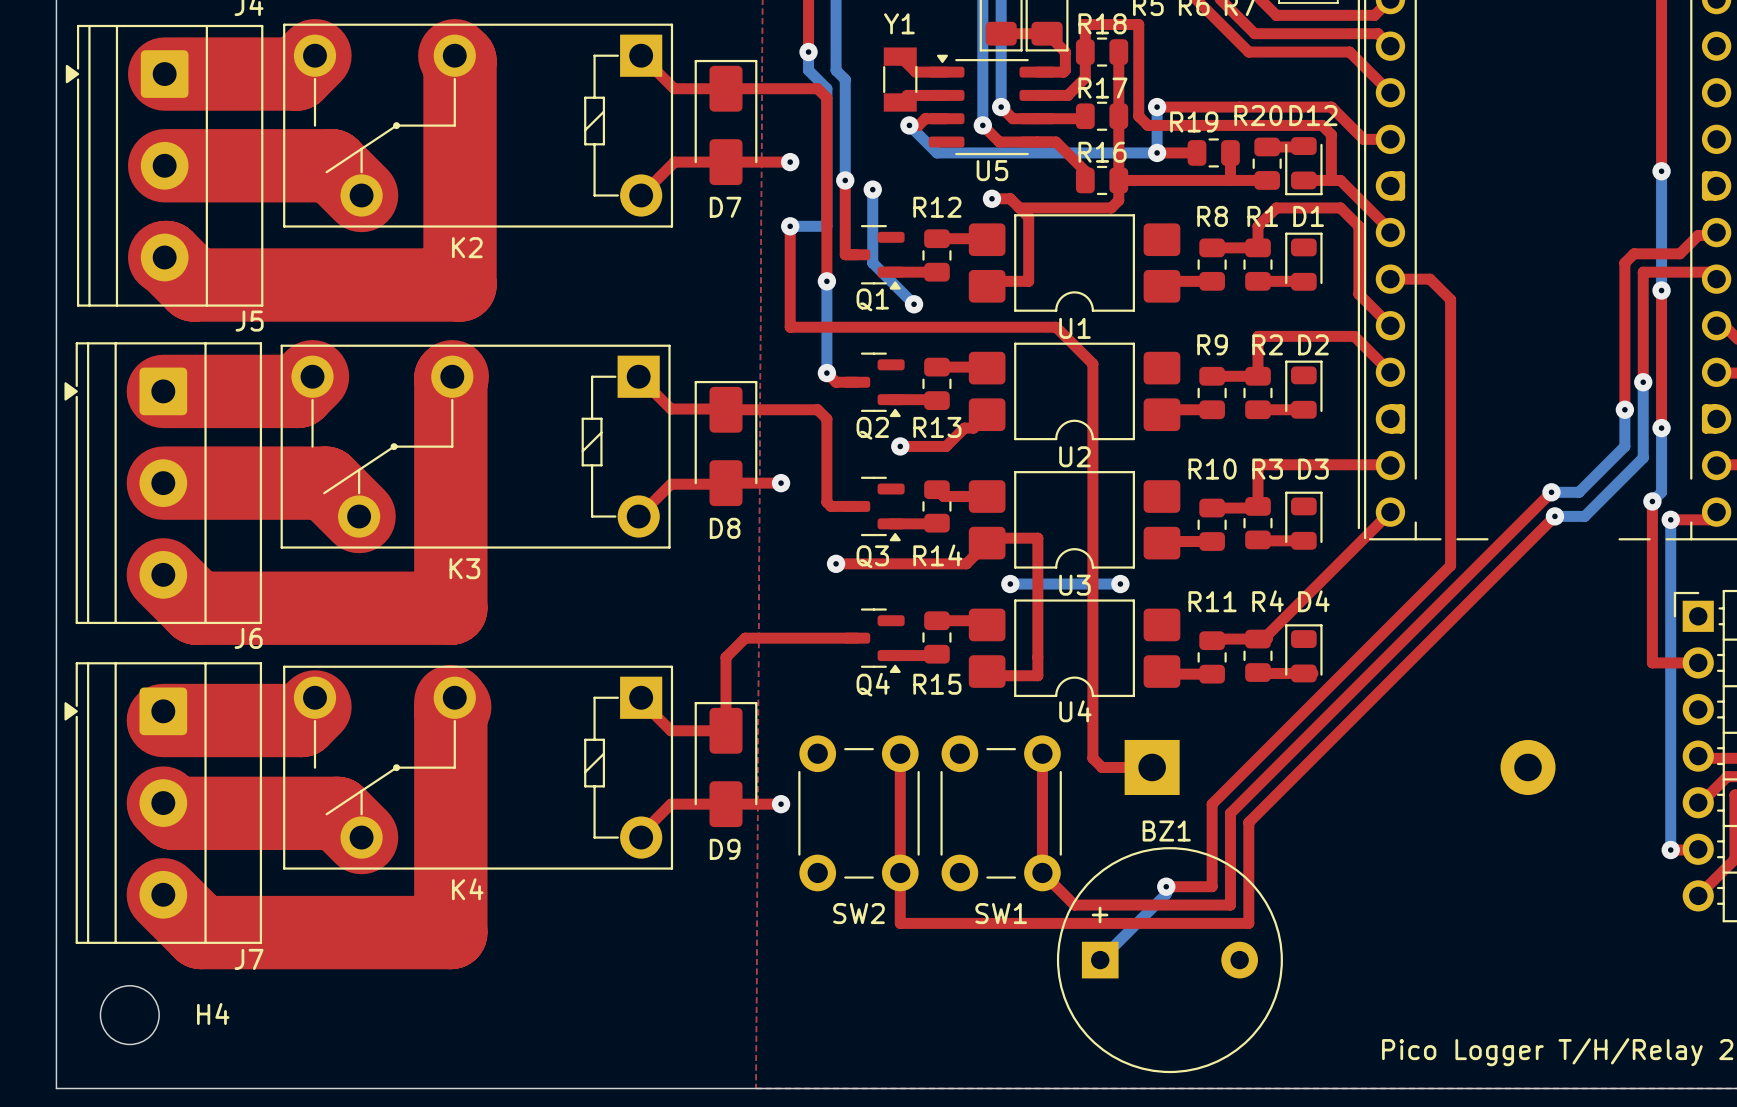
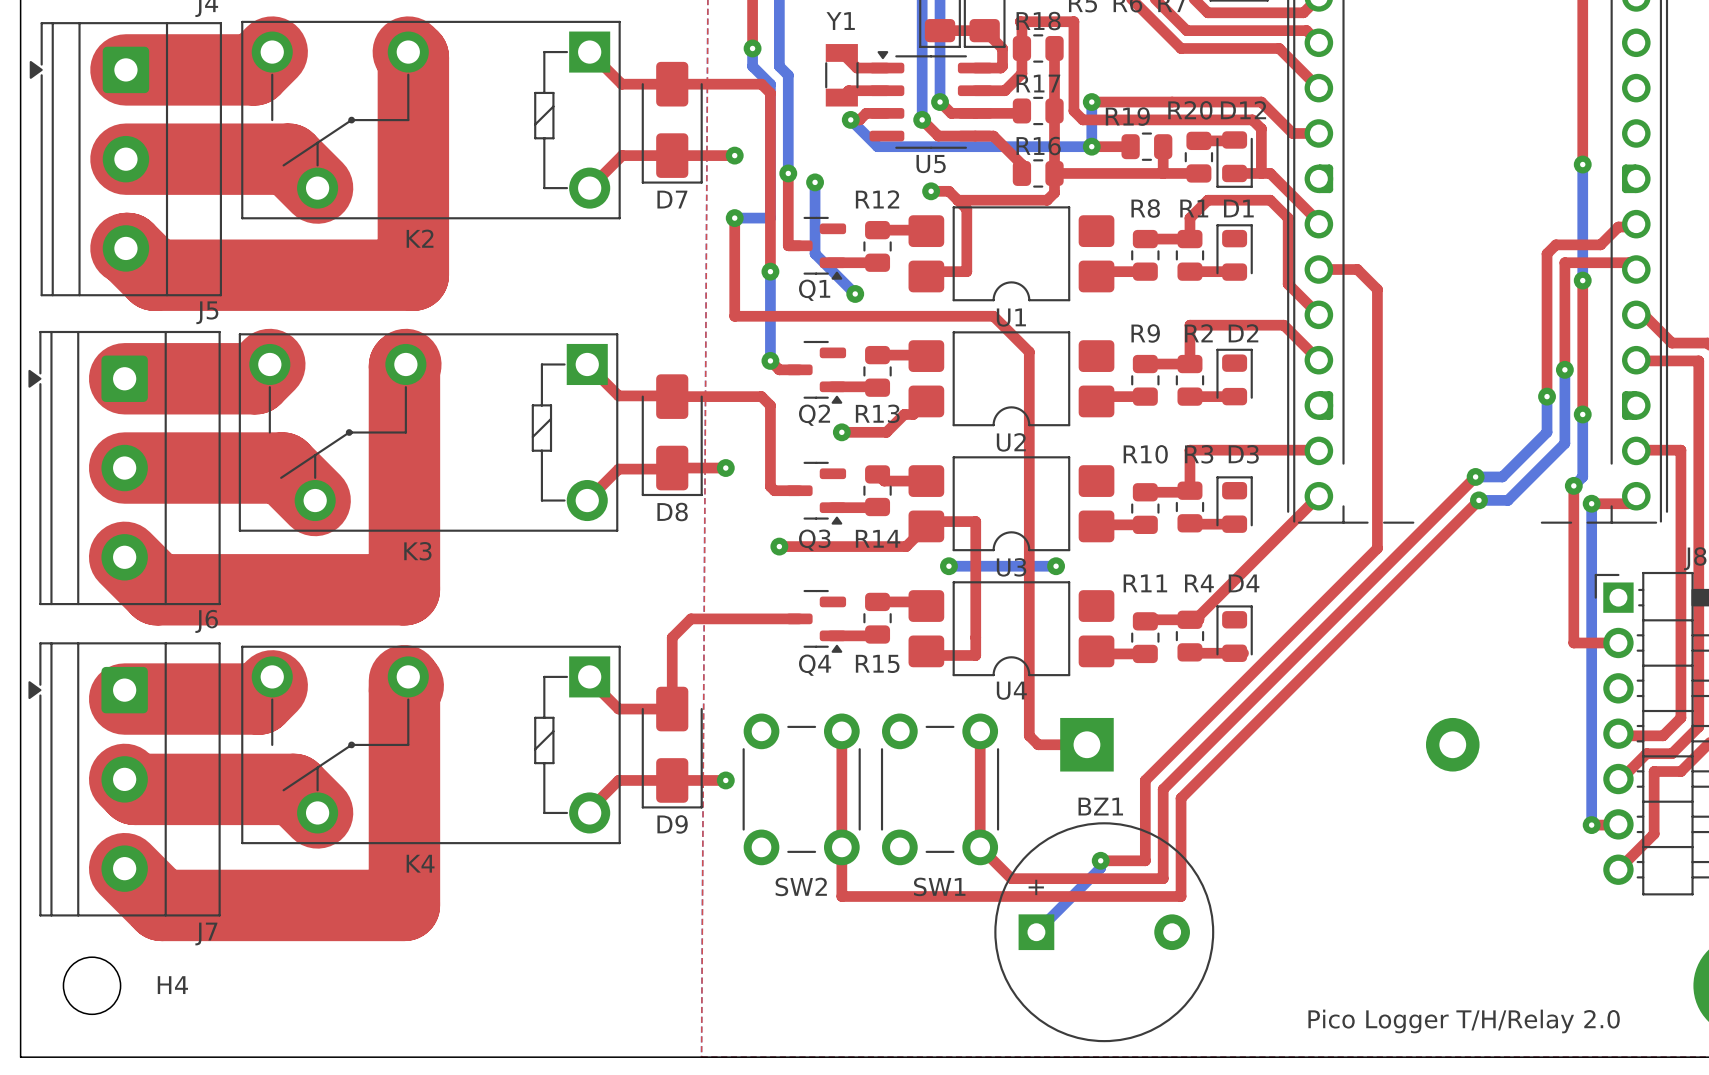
D7 rotation: 0° (726, 122) -> 180° (672, 122)
D8 rotation: 0° (726, 443) -> 180° (672, 435)
D9 rotation: 0° (726, 764) -> 180° (672, 747)

